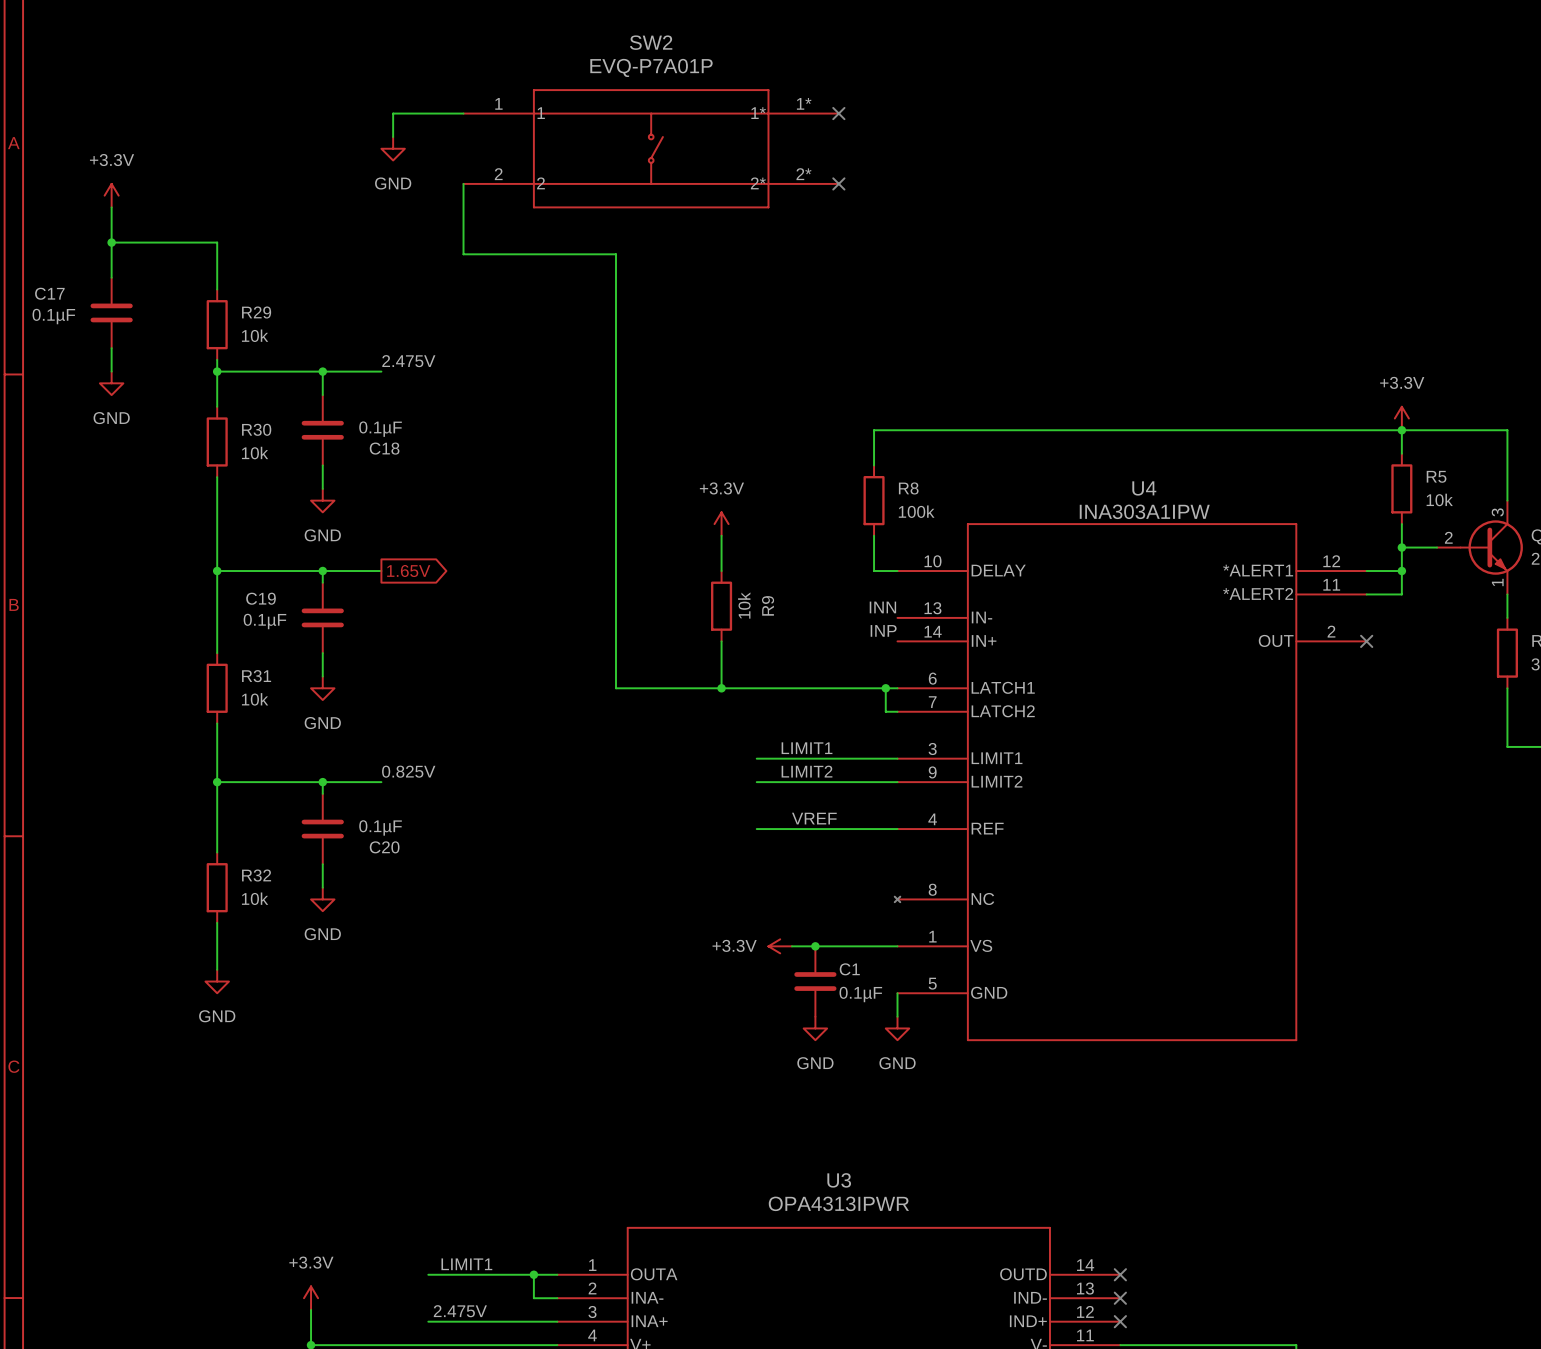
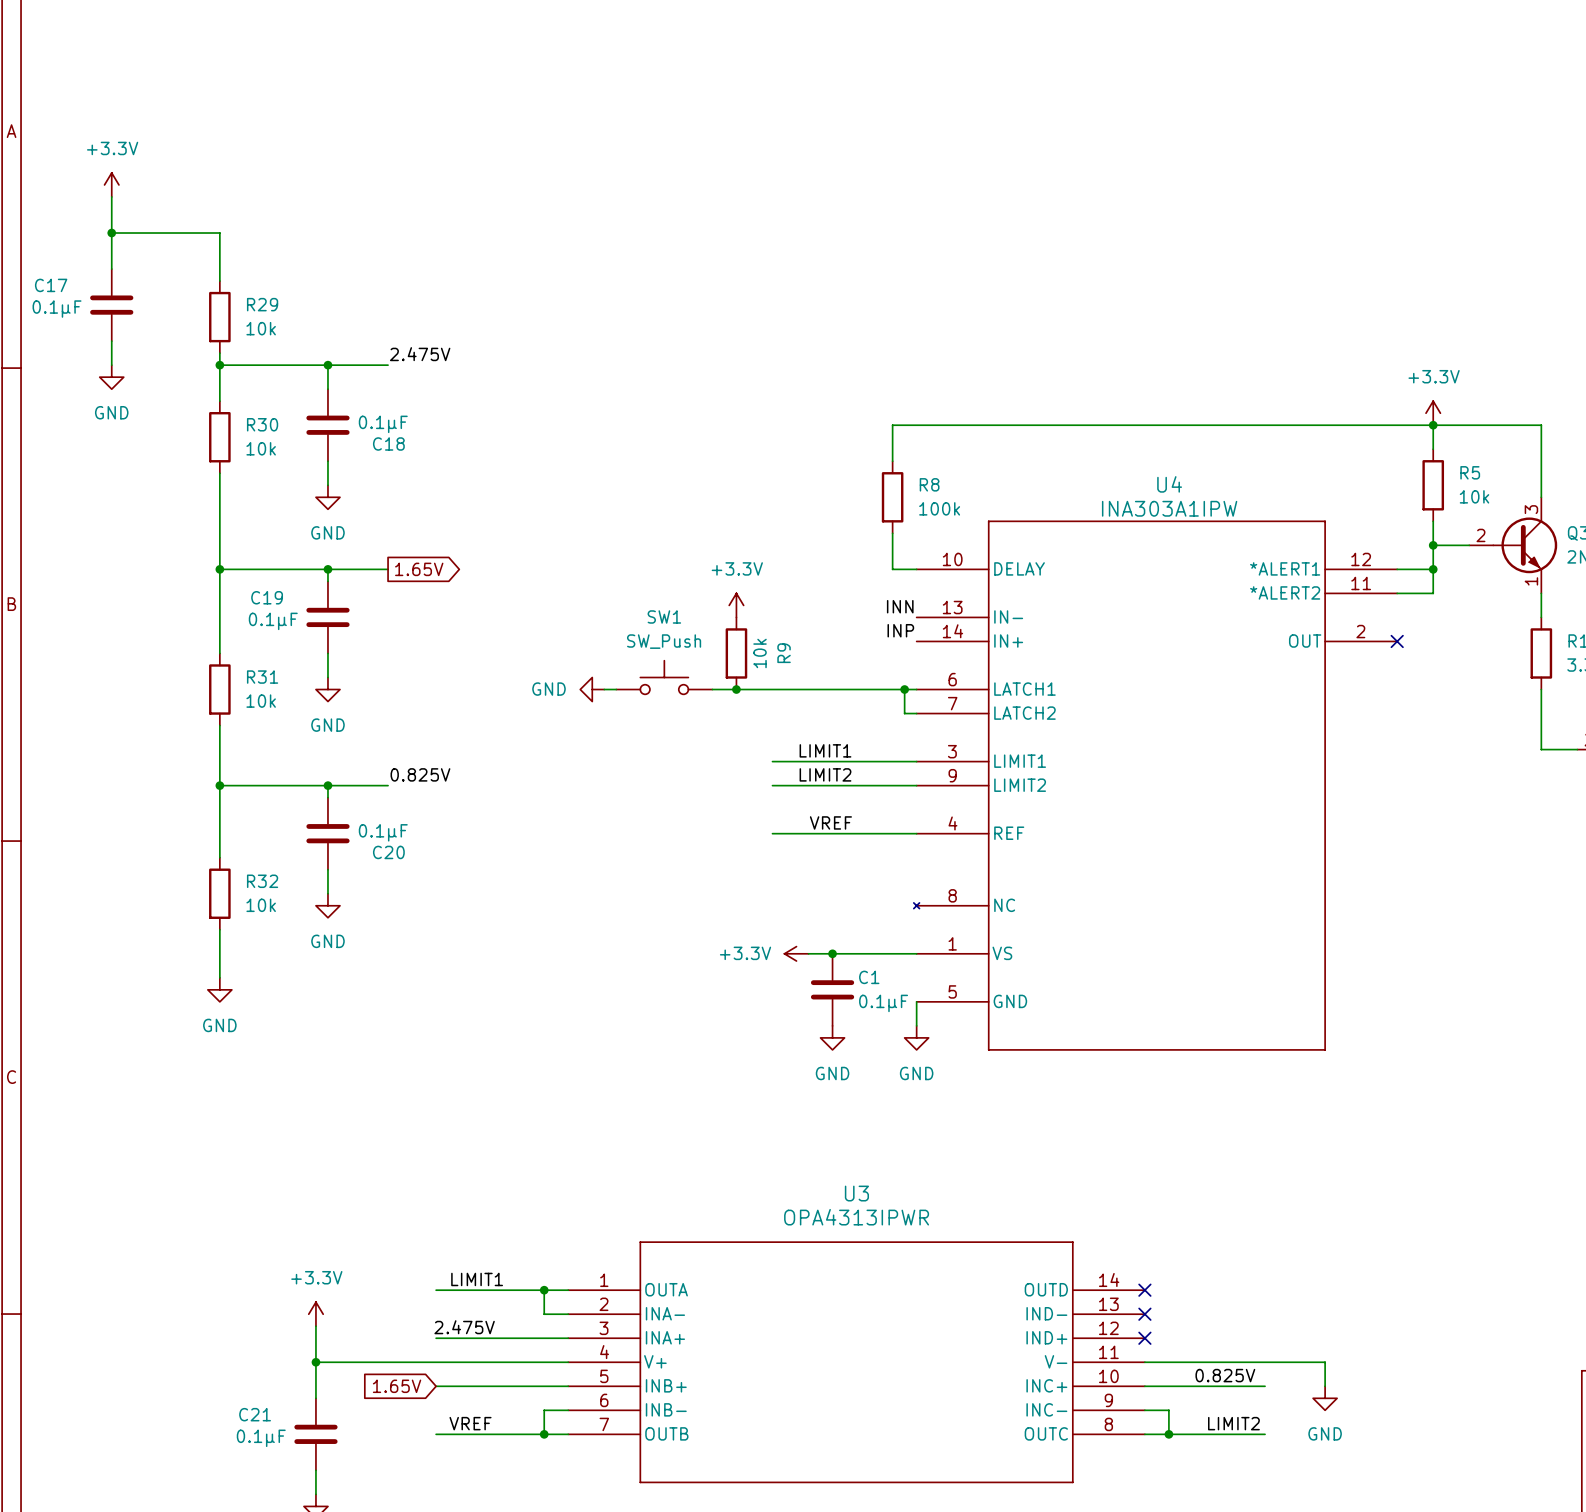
wire: (463, 113) (393, 113) (393, 137) -> none
no-connect mark: (838, 113) -> none
power symbol: GND (393, 148) -> none
SW2: EVQ-P7A01P (651, 148) -> none
wire: (463, 183) (463, 254) (616, 254) (616, 688) (698, 688) -> none
no-connect mark: (838, 183) -> none
power symbol position: +3.3V (721, 524) -> +3.3V (736, 605)
wire: (721, 535) (721, 571) -> none
R9 position: (721, 606) -> (736, 653)
wire: (721, 641) (721, 688) -> none
SW1: none -> SW_Push (664, 677)
power symbol: none -> GND (592, 689)
wire: none -> (604, 689) (616, 689)

